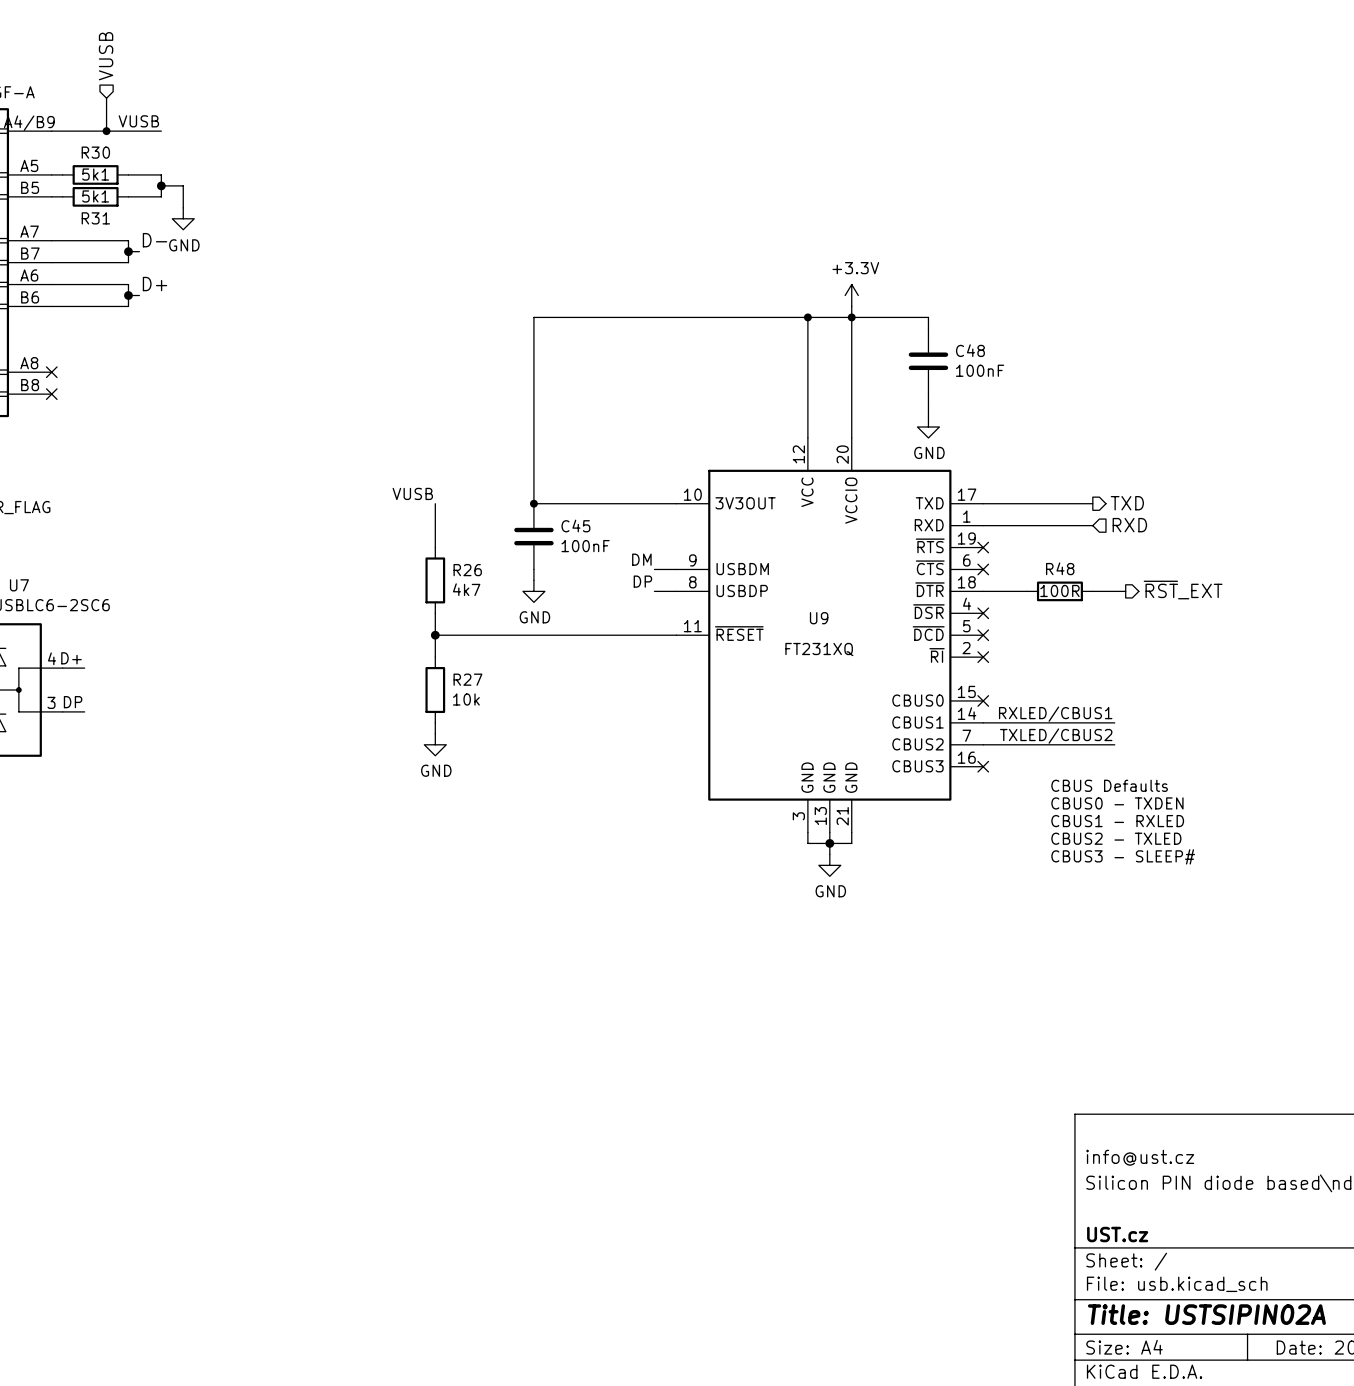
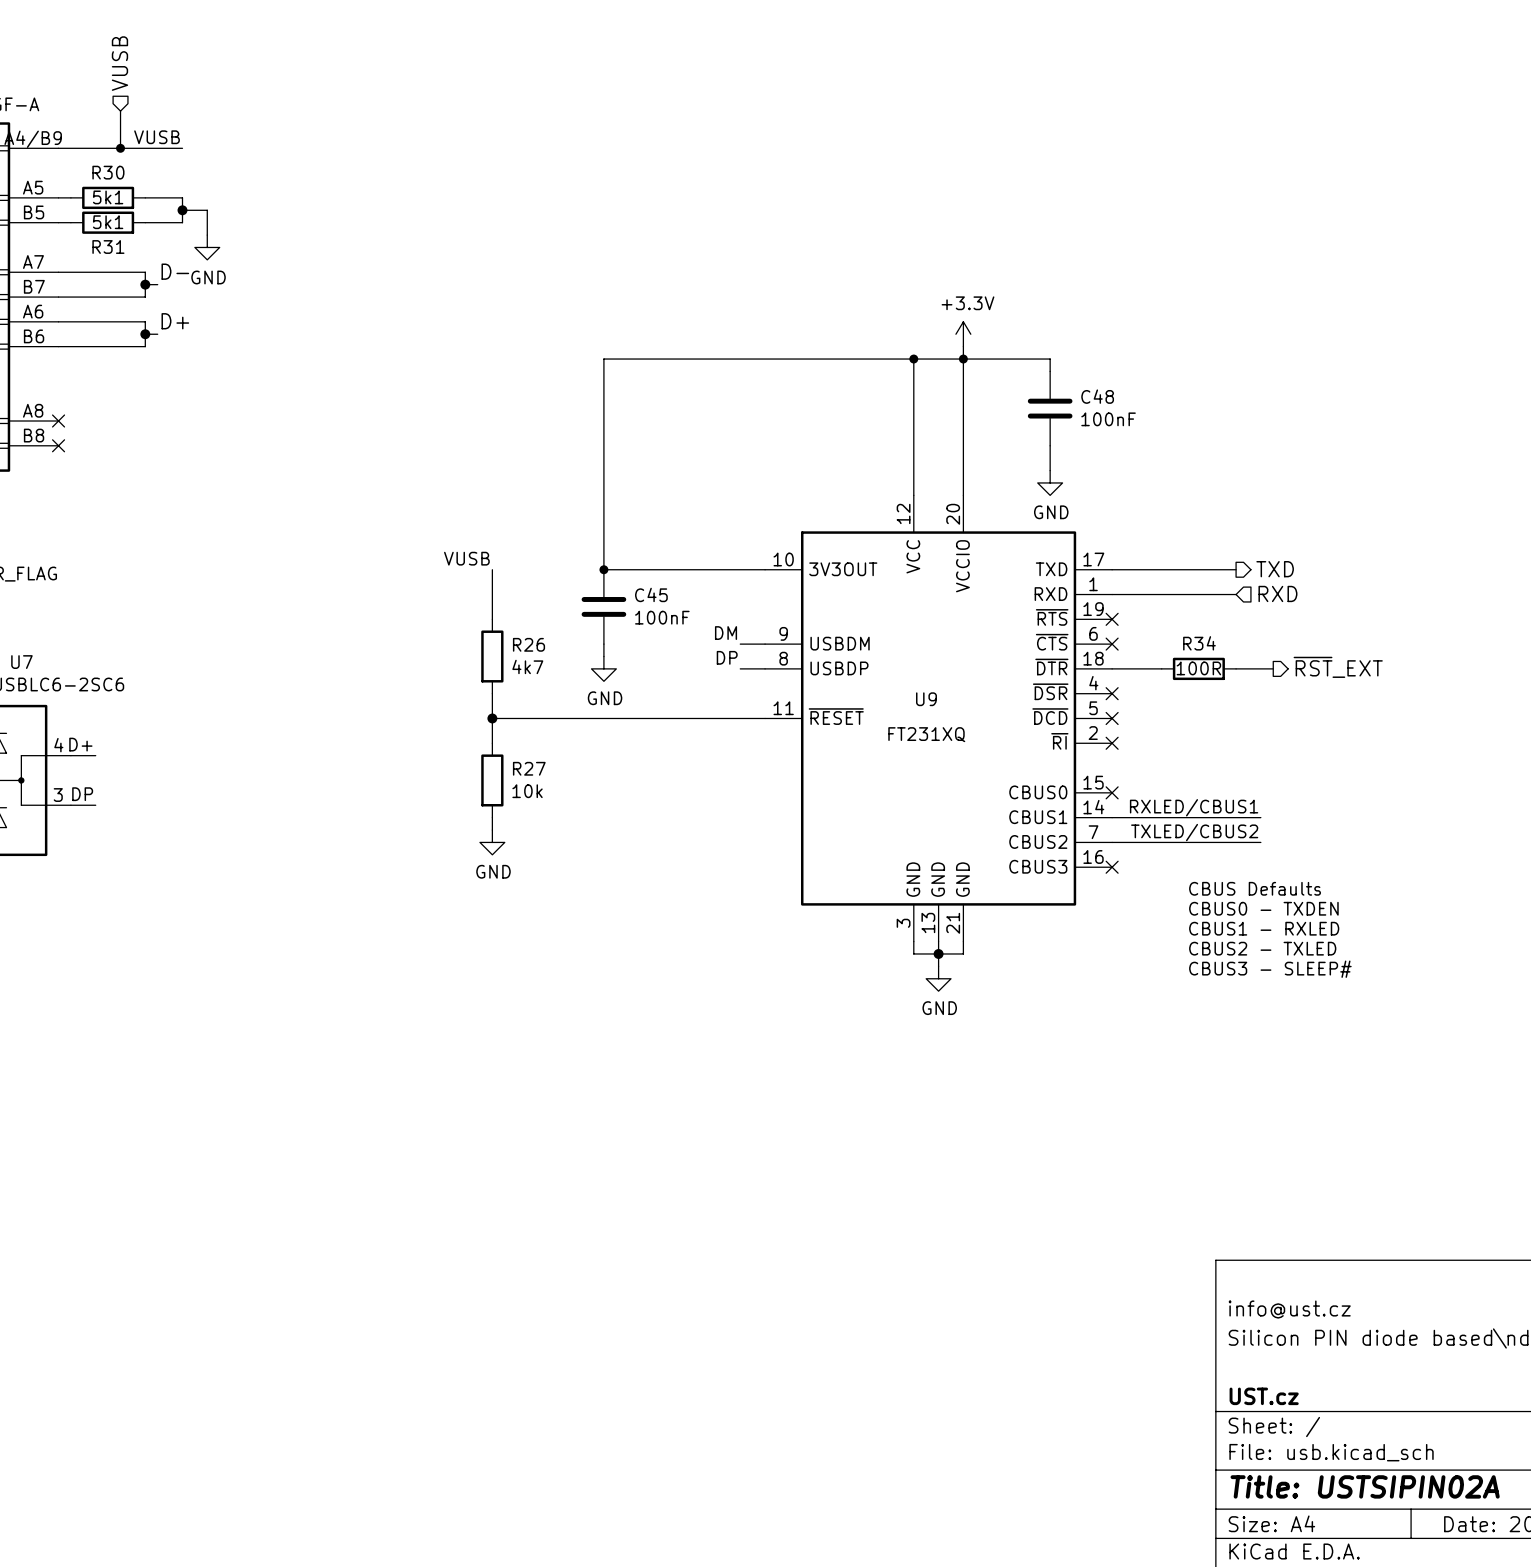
R48 name: R48 (1060, 568) -> R34 (1199, 643)

